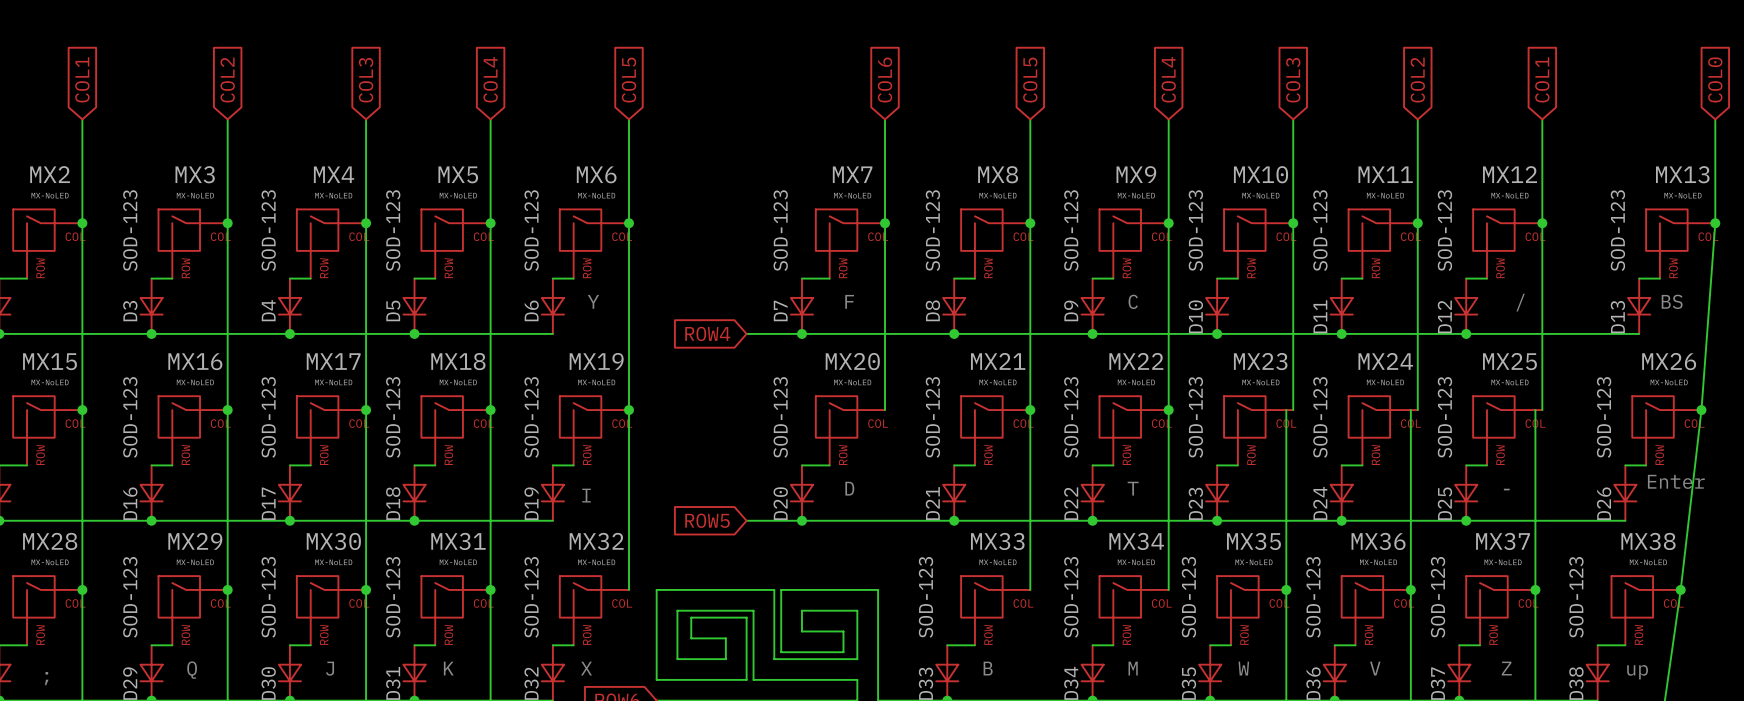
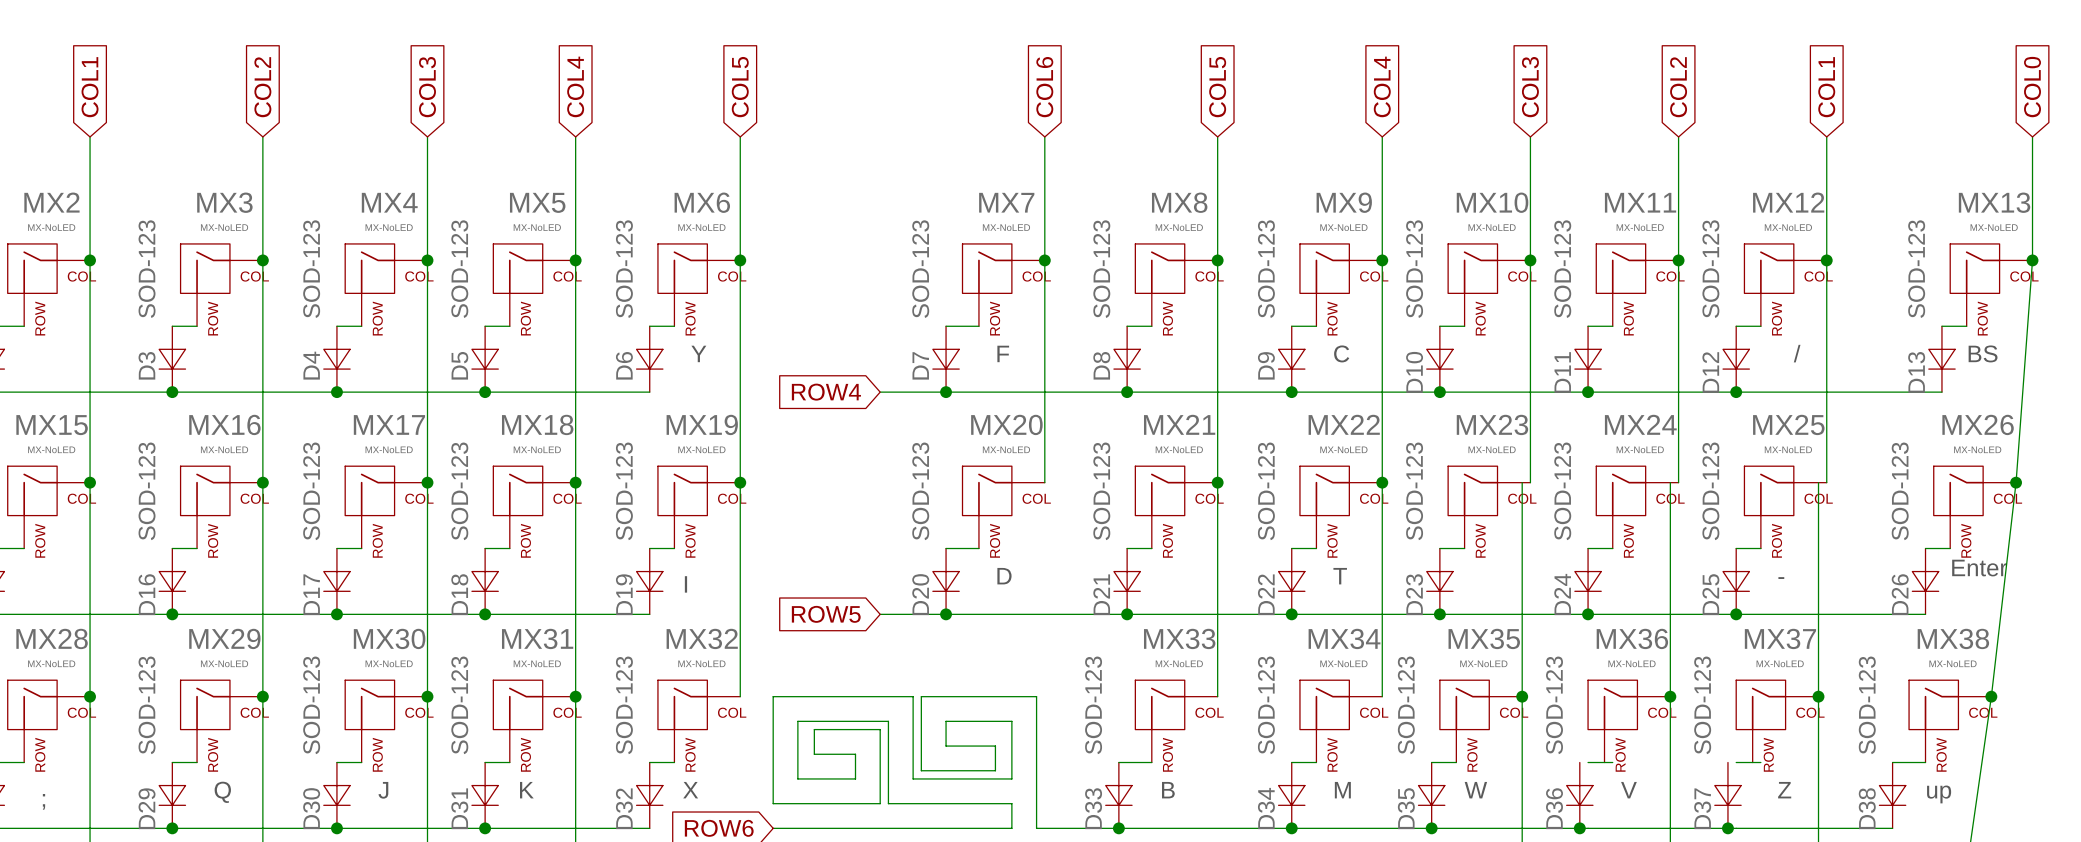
wire: (1334, 645) (1341, 645) -> (1604, 762) (1612, 762)
wire: (1459, 645) (1466, 645) -> (1752, 762) (1760, 762)

